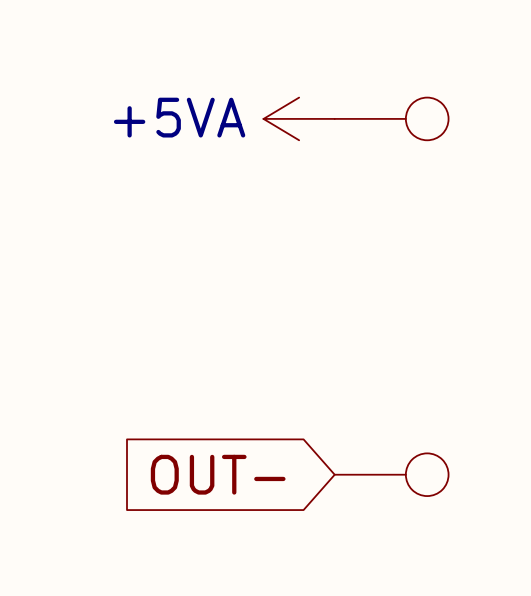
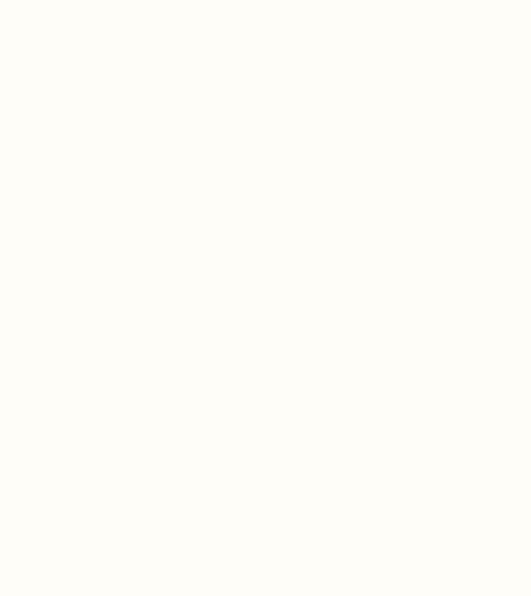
power symbol: +5VA (299, 118) -> none
part: (391, 118) -> none
global label: OUT- (218, 474) -> none
part: (391, 474) -> none

